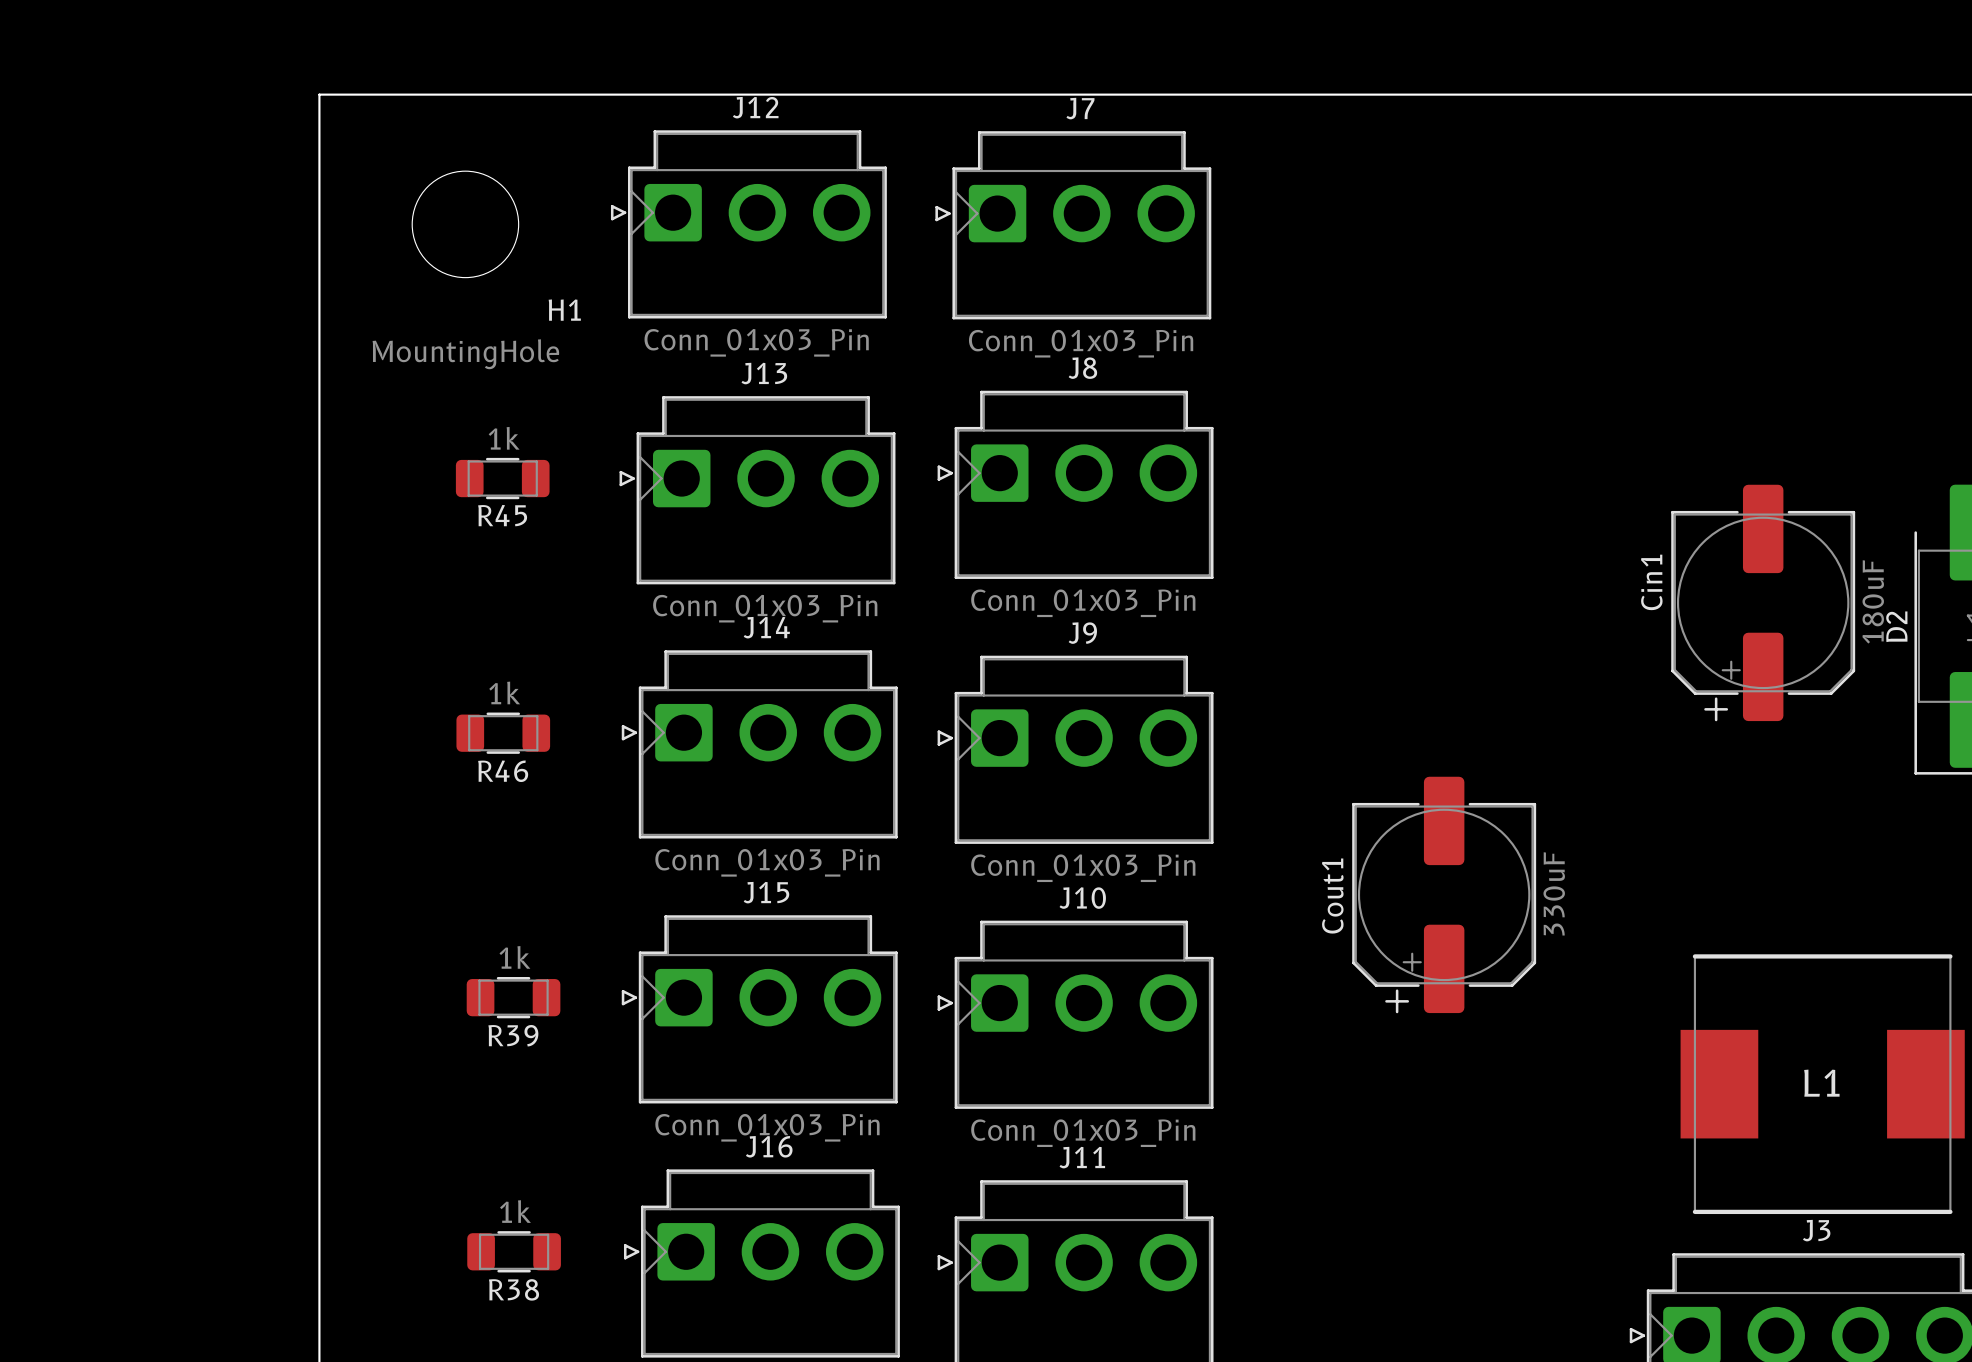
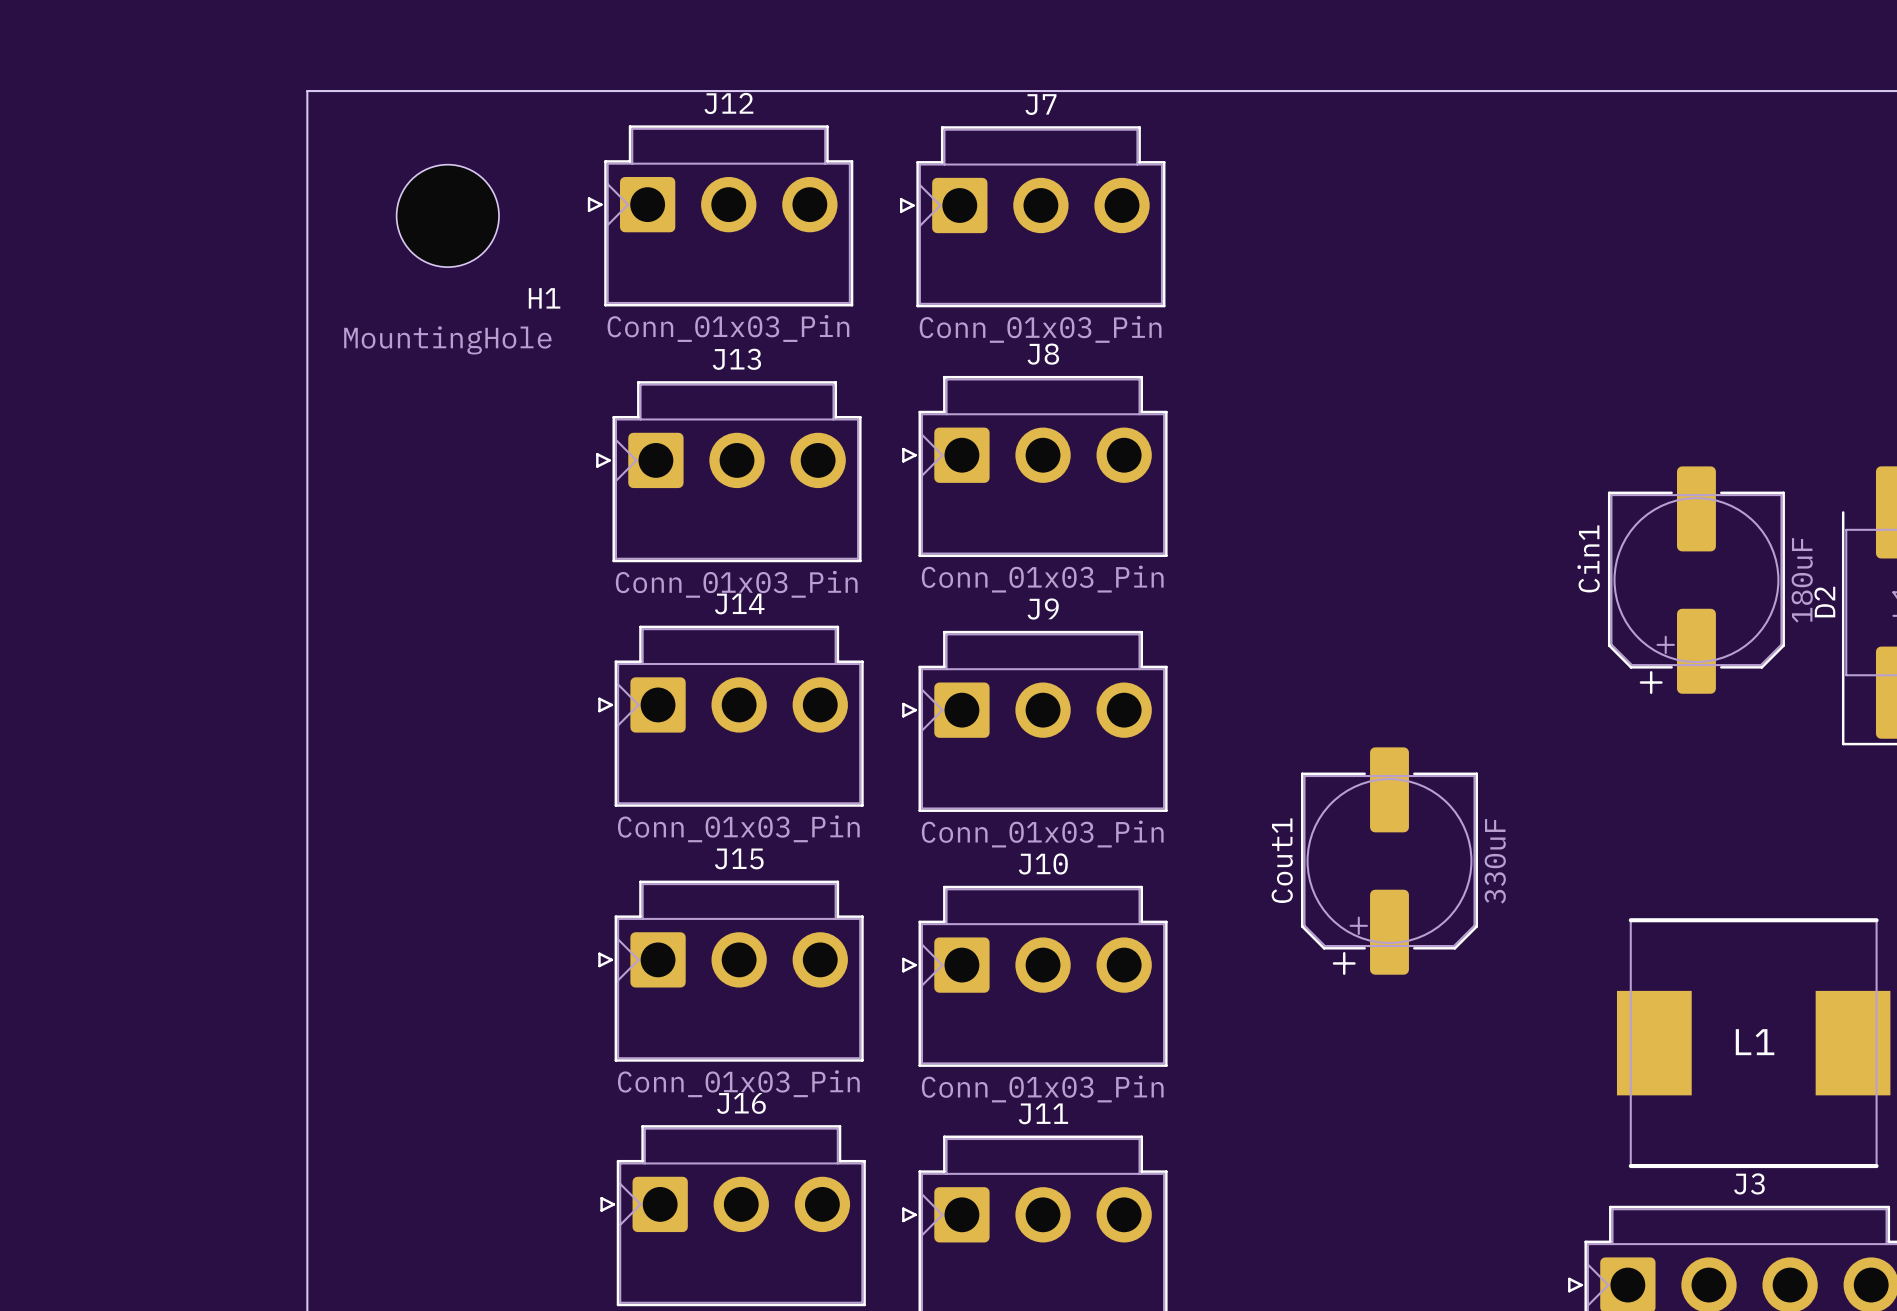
R45: 1k (502, 478) -> none
R46: 1k (503, 733) -> none
R39: 1k (513, 997) -> none
R38: 1k (514, 1251) -> none

